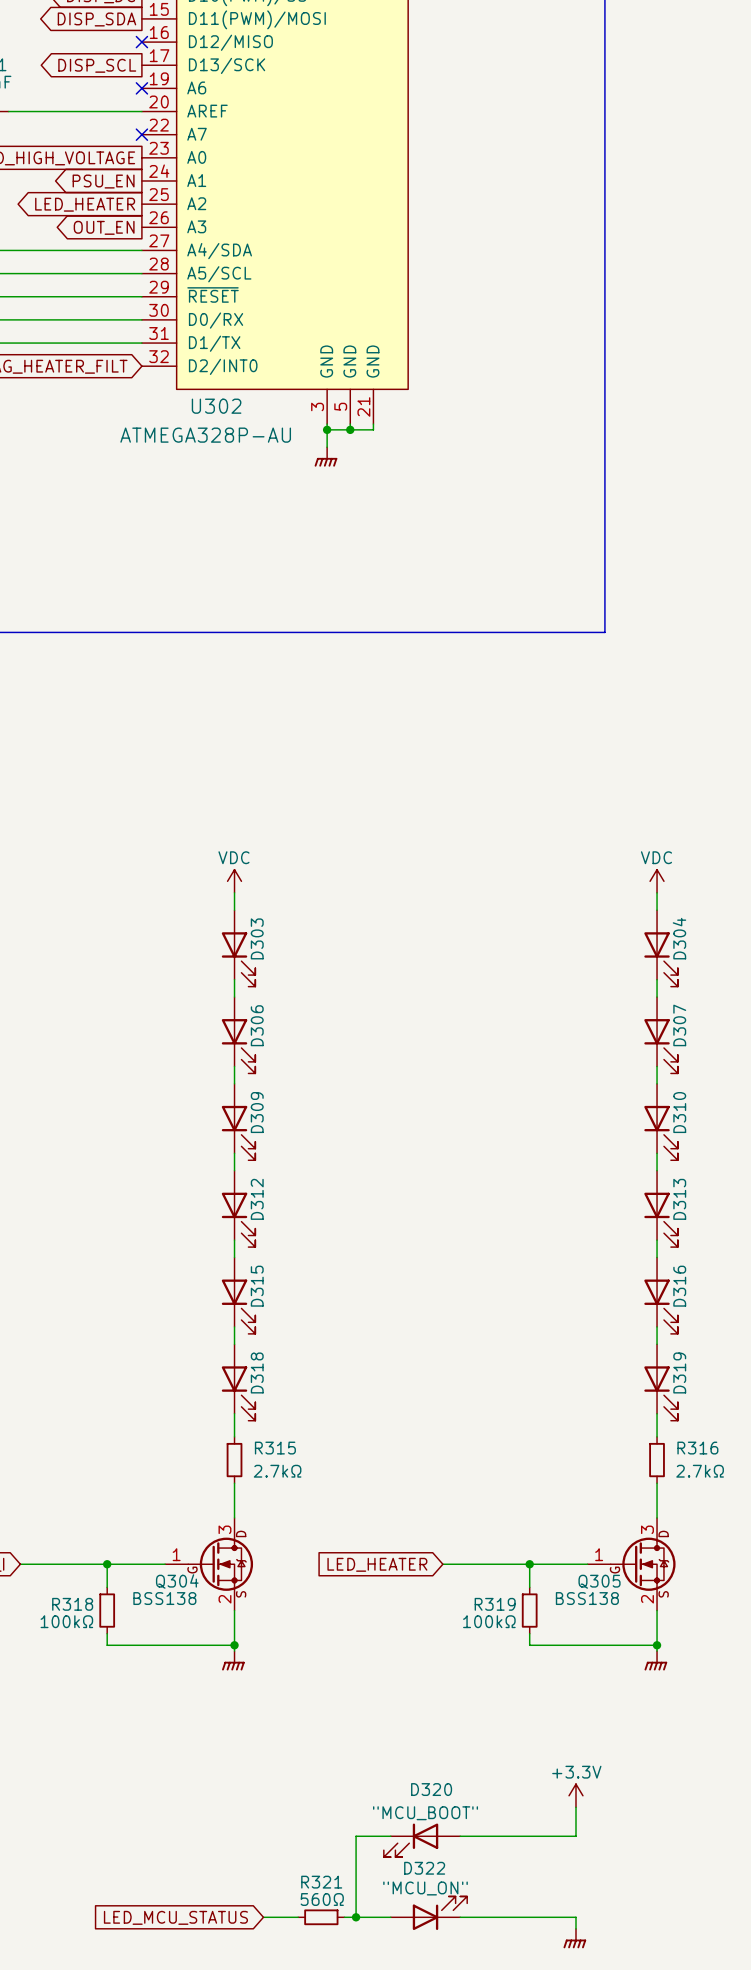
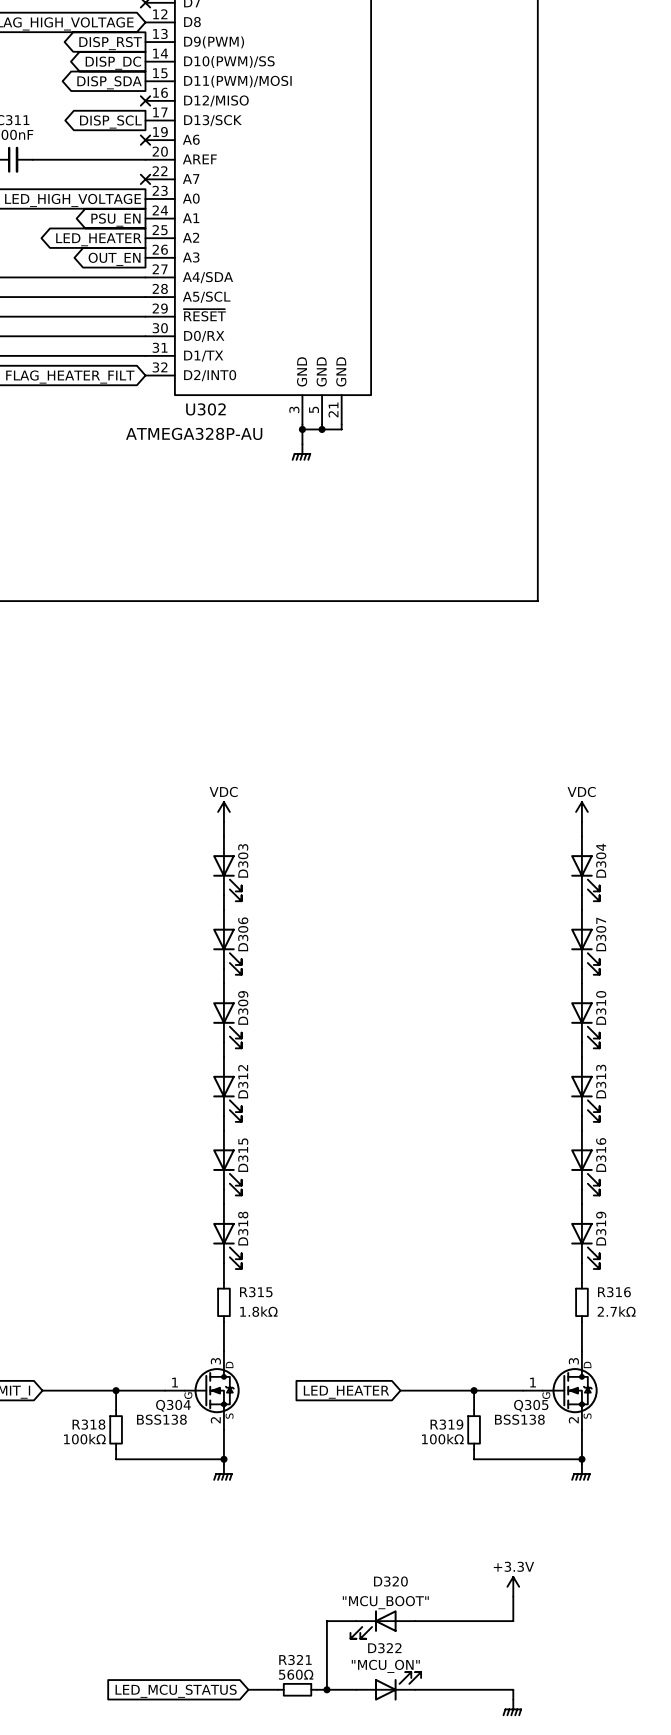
R315 value: 2.7kΩ (277, 1471) -> 1.8kΩ (258, 1311)

